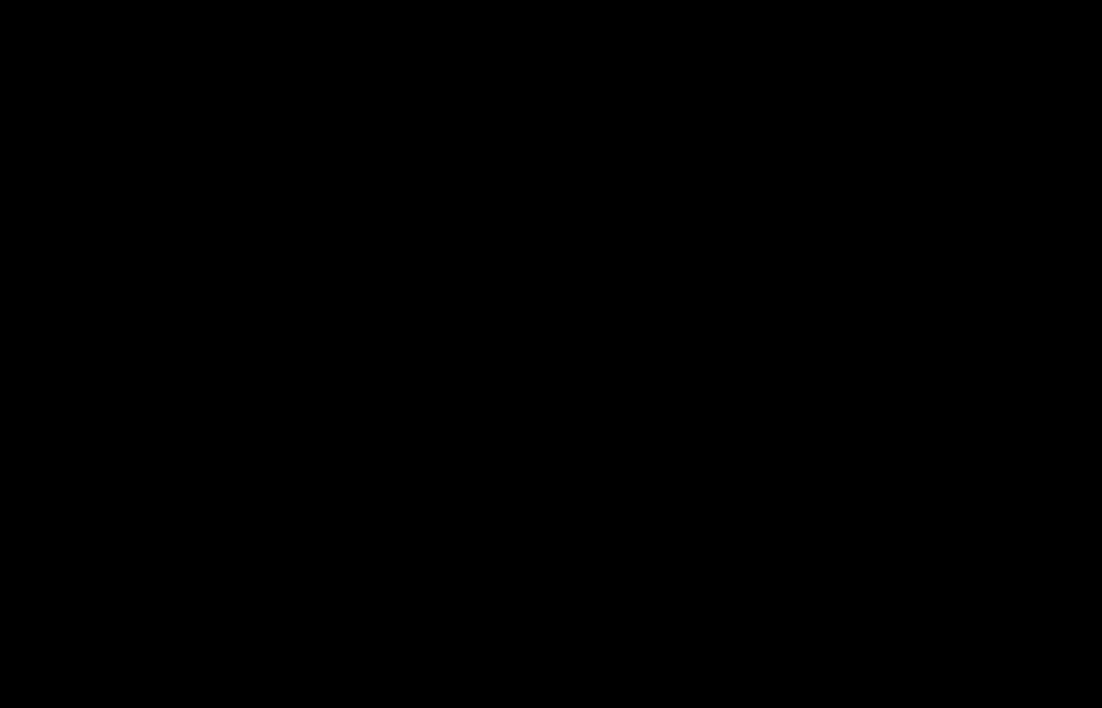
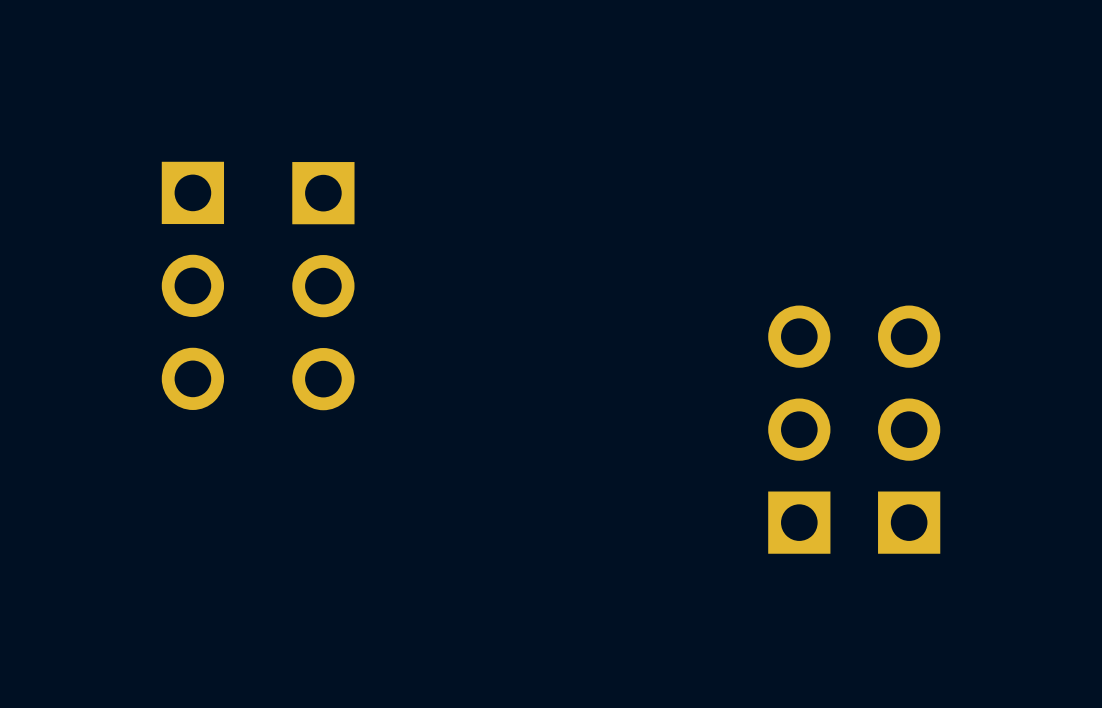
part: none -> (192, 285)
part: none -> (323, 286)
part: none -> (799, 429)
part: none -> (909, 429)

